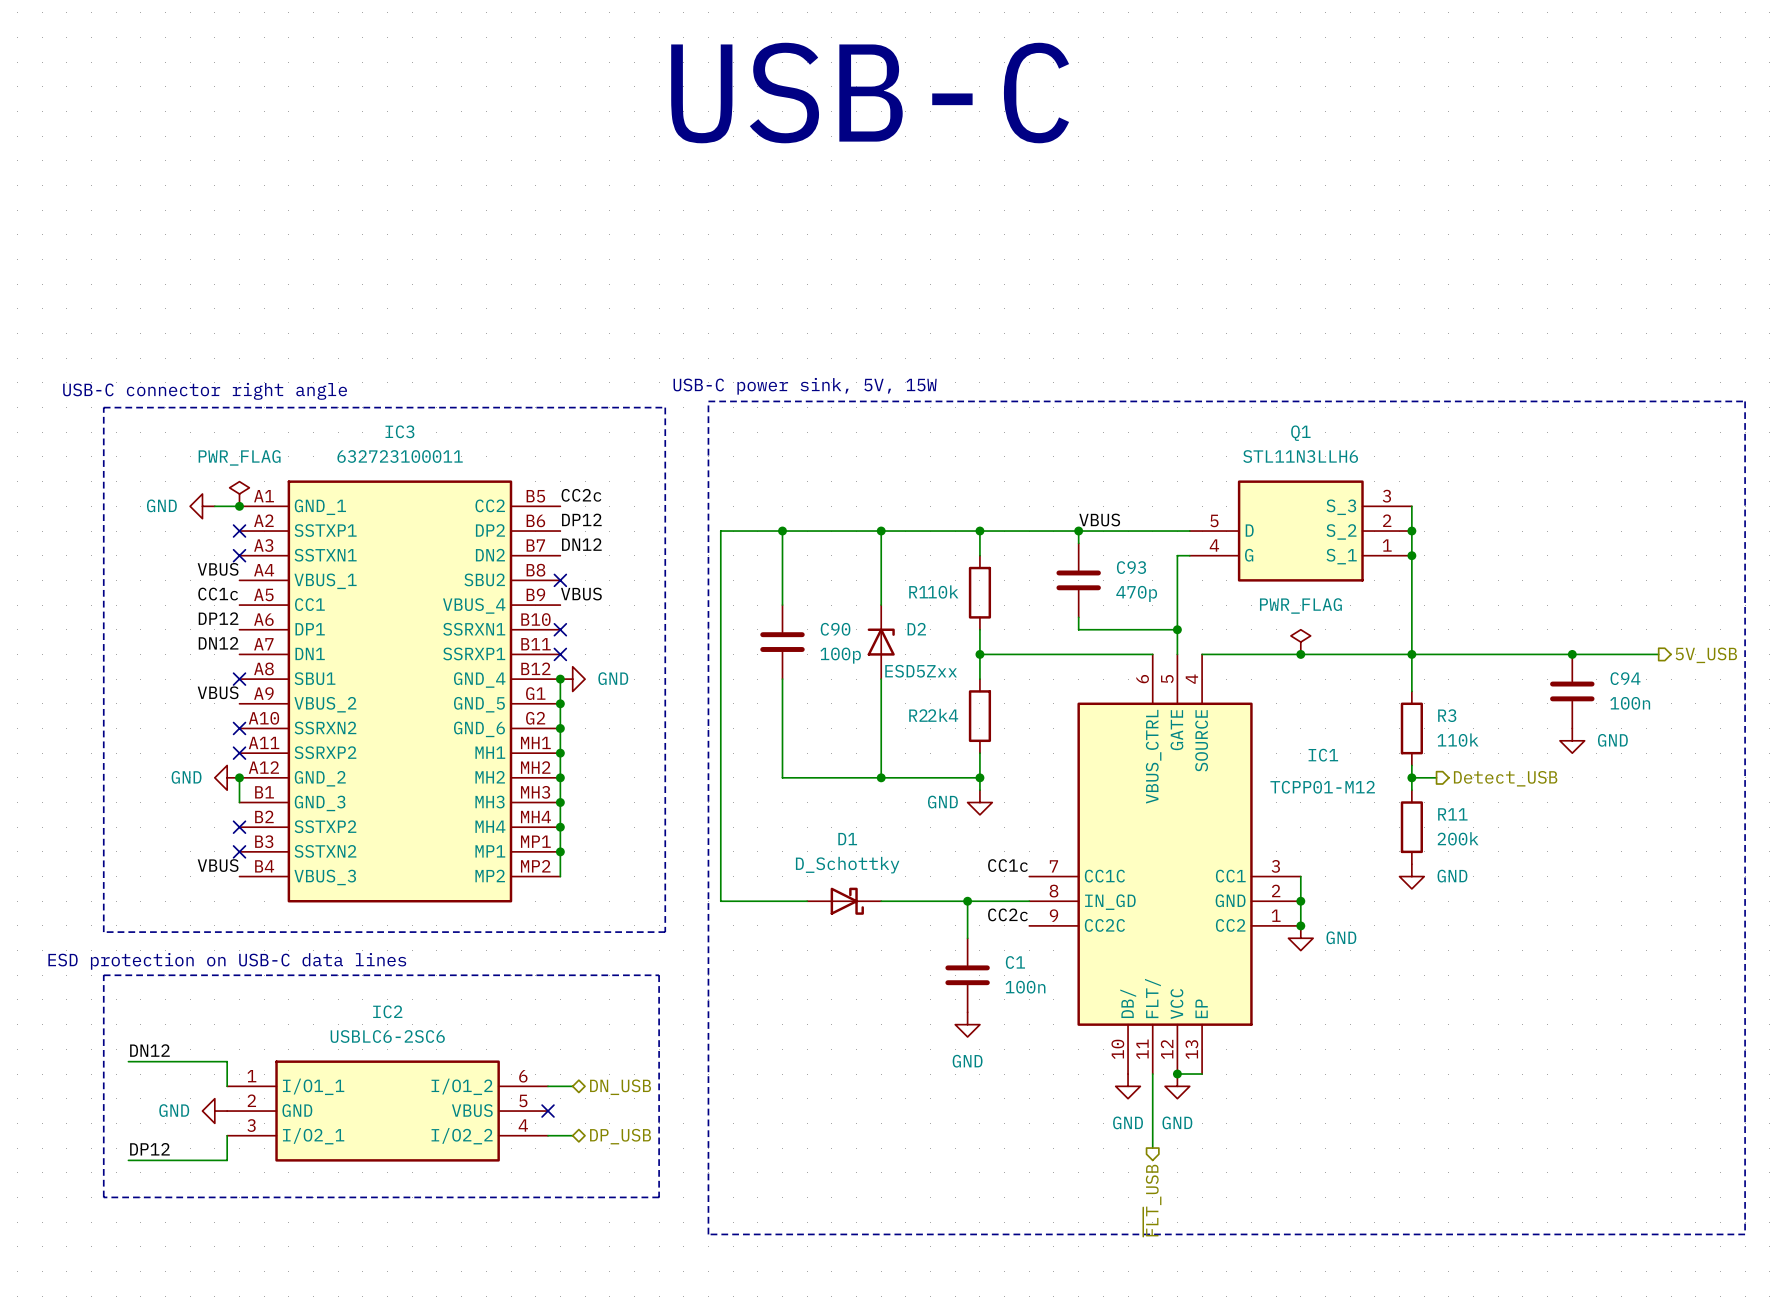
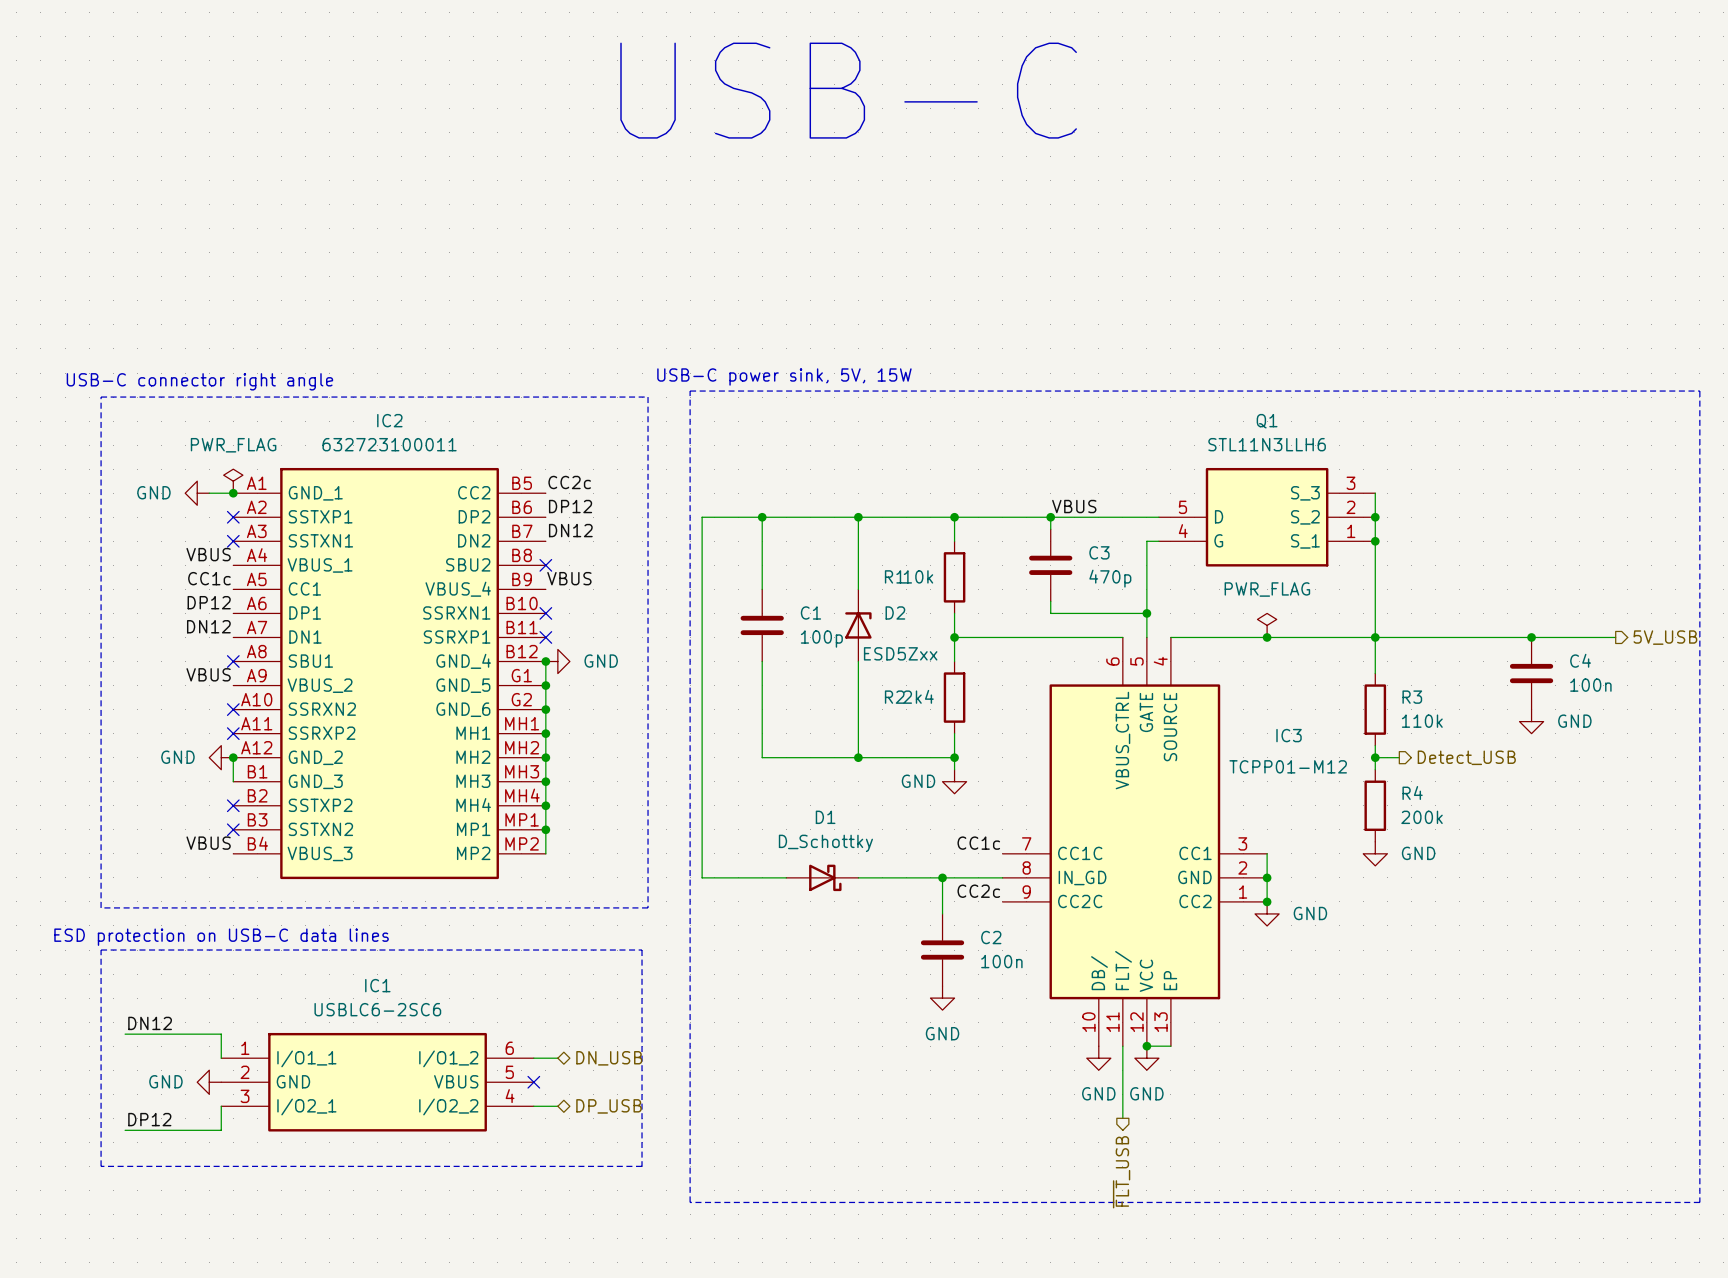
IC3 name: IC3 (399, 431) -> IC2 (389, 420)
C93 name: C93 (1131, 567) -> C3 (1099, 552)
C90 name: C90 (835, 629) -> C1 (810, 612)
C94 name: C94 (1625, 678) -> C4 (1580, 660)
IC1 name: IC1 (1323, 755) -> IC3 (1289, 735)
R11 name: R11 (1452, 814) -> R4 (1412, 793)
C1 name: C1 (1015, 962) -> C2 (991, 937)
IC2 name: IC2 (387, 1011) -> IC1 (377, 985)

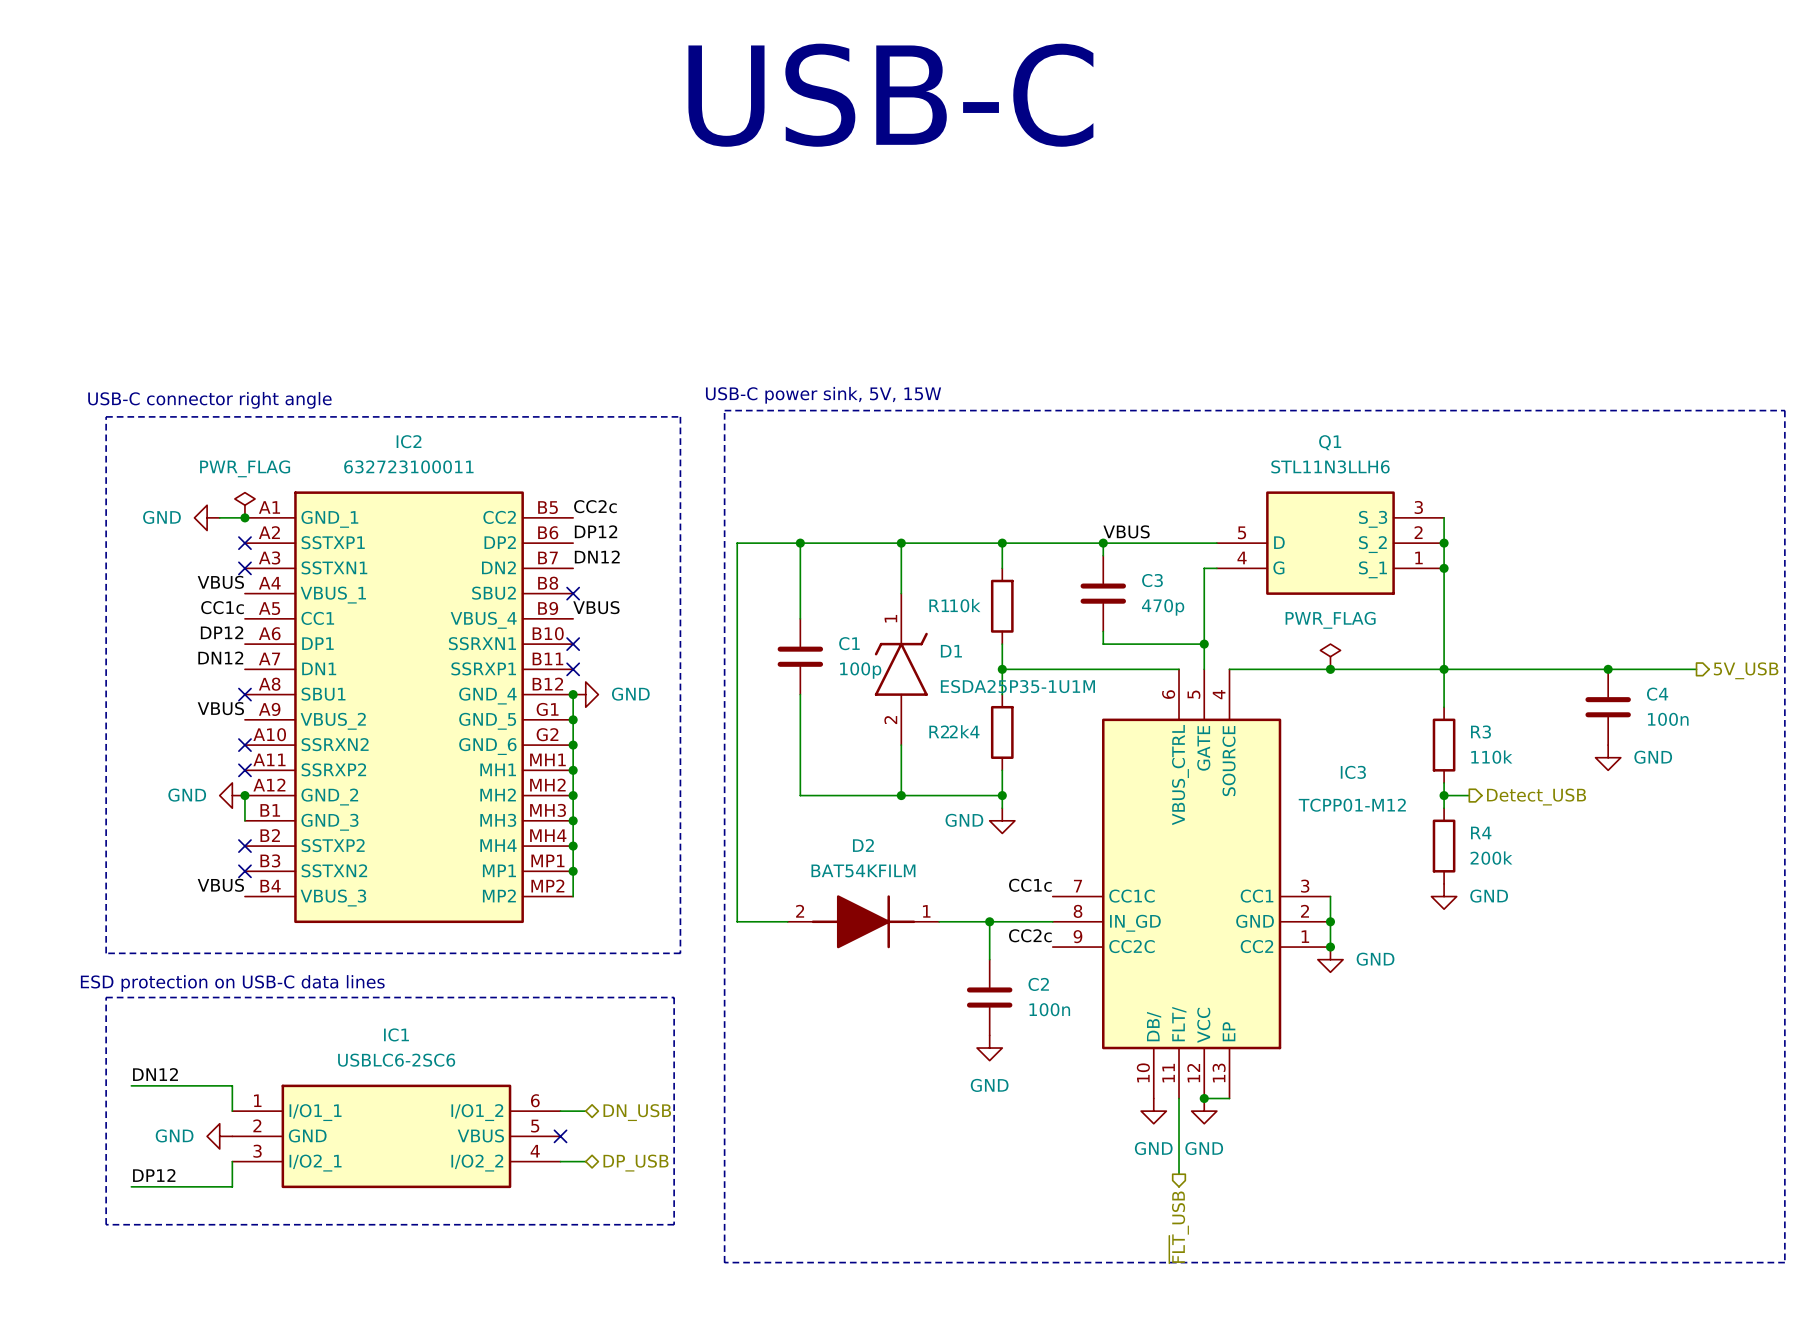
D2 symbol: [845, 589, 872, 662] -> [787, 895, 940, 949]
D2 name position: D2 (895, 612) -> D2 (863, 845)
D2 value: ESD5Zxx (900, 653) -> BAT54KFILM (863, 870)
D1 name position: D1 (825, 817) -> D1 (951, 651)
D1 value: D_Schottky (825, 843) -> ESDA25P35-1U1M (1017, 686)
D1 symbol: [786, 864, 859, 892] -> [874, 593, 928, 746]

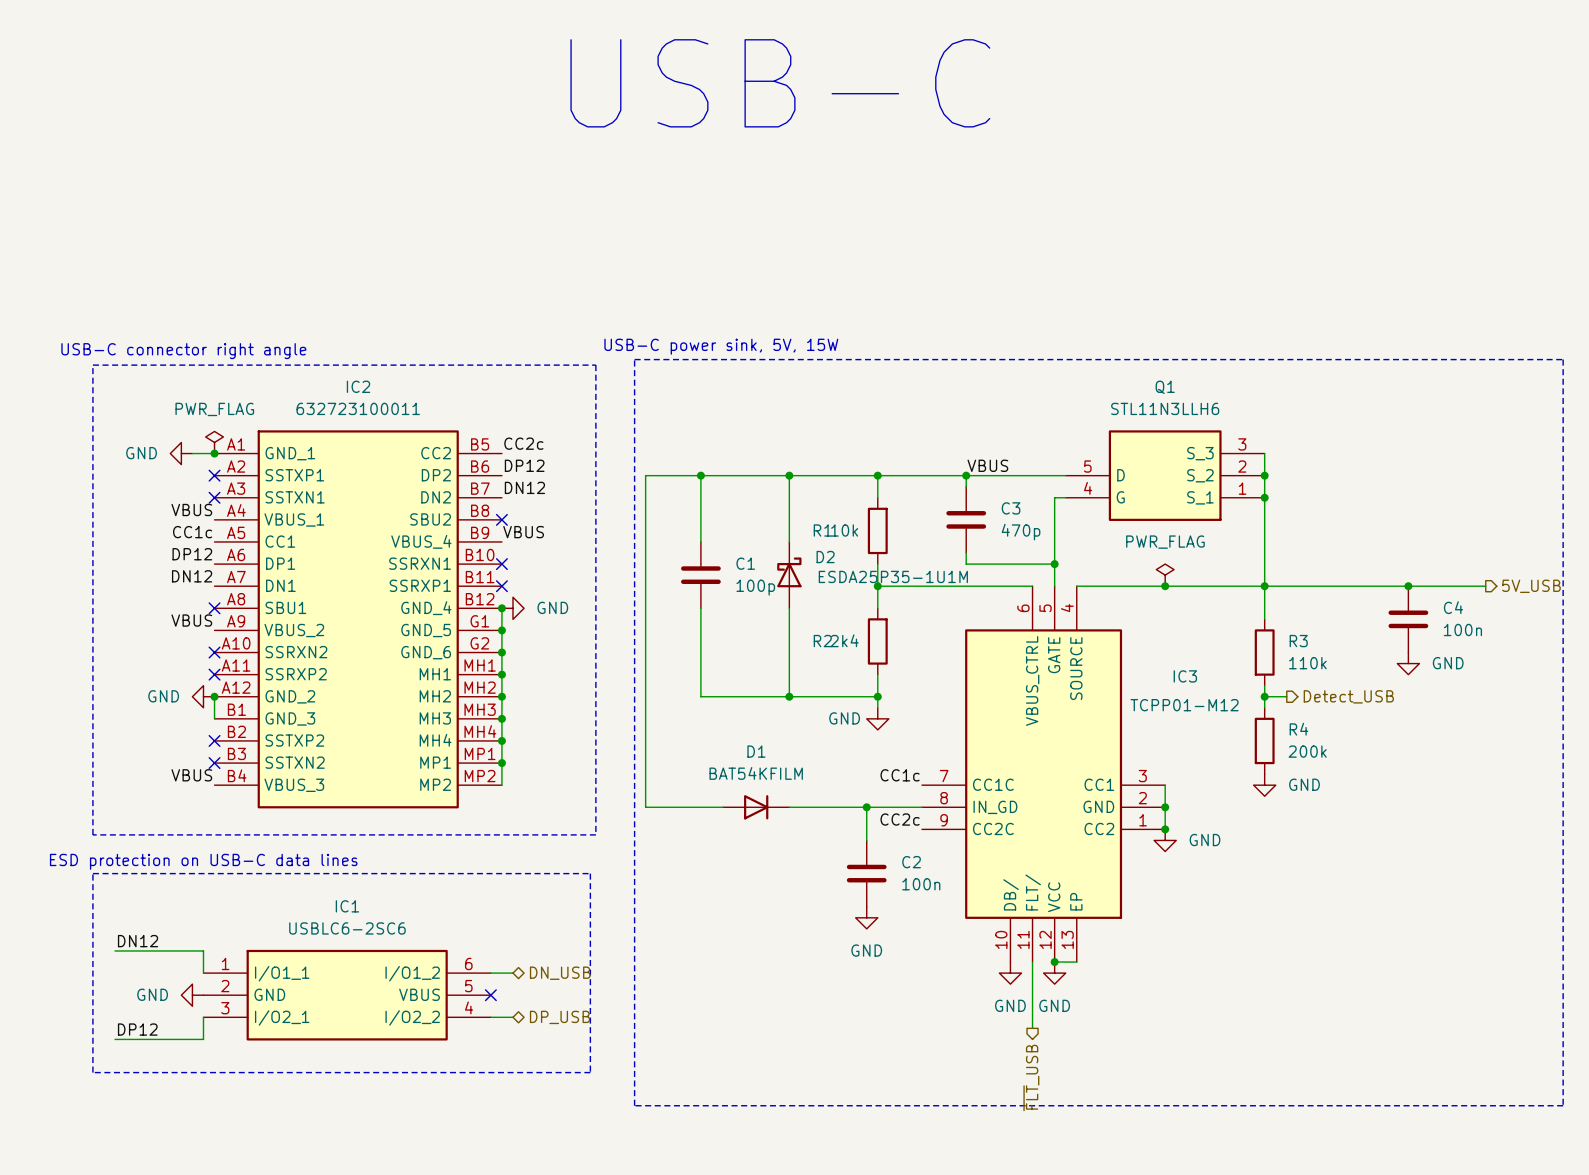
D1 symbol: [874, 593, 928, 746] -> [723, 795, 790, 820]
D1 name position: D1 (951, 651) -> D1 (756, 751)
D1 value: ESDA25P35-1U1M (1017, 686) -> BAT54KFILM (756, 773)
D2 name position: D2 (863, 845) -> D2 (825, 557)
D2 value: BAT54KFILM (863, 870) -> ESDA25P35-1U1M (893, 576)
D2 symbol: [787, 895, 940, 949] -> [777, 541, 802, 609]

